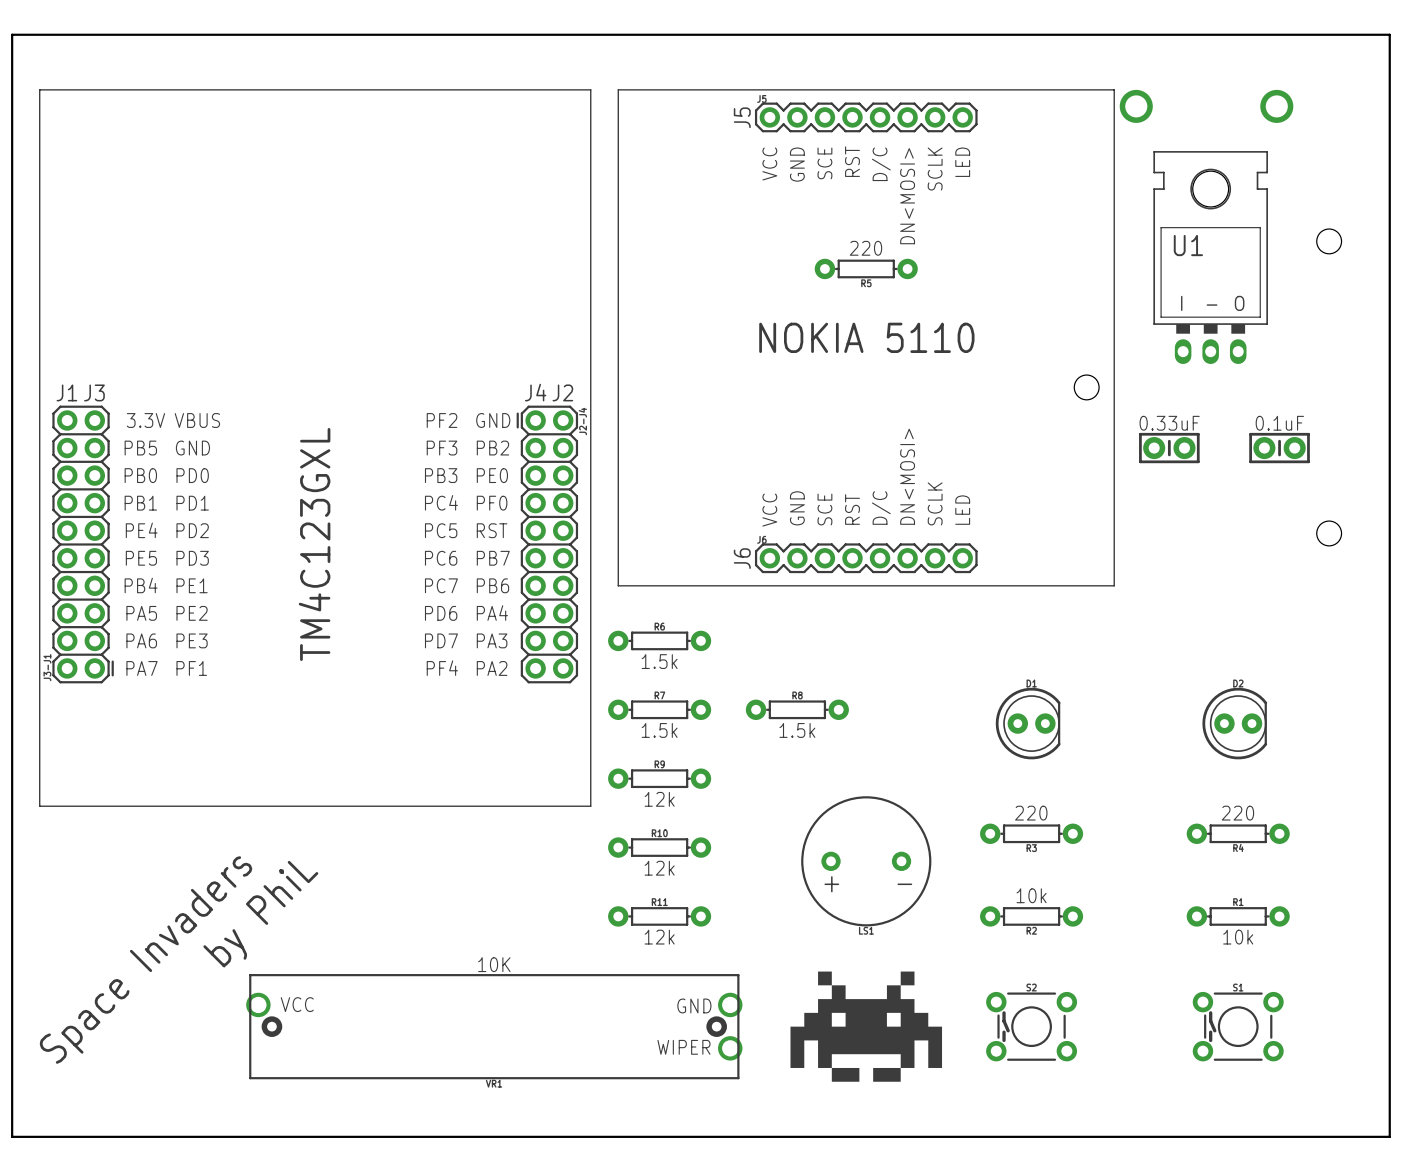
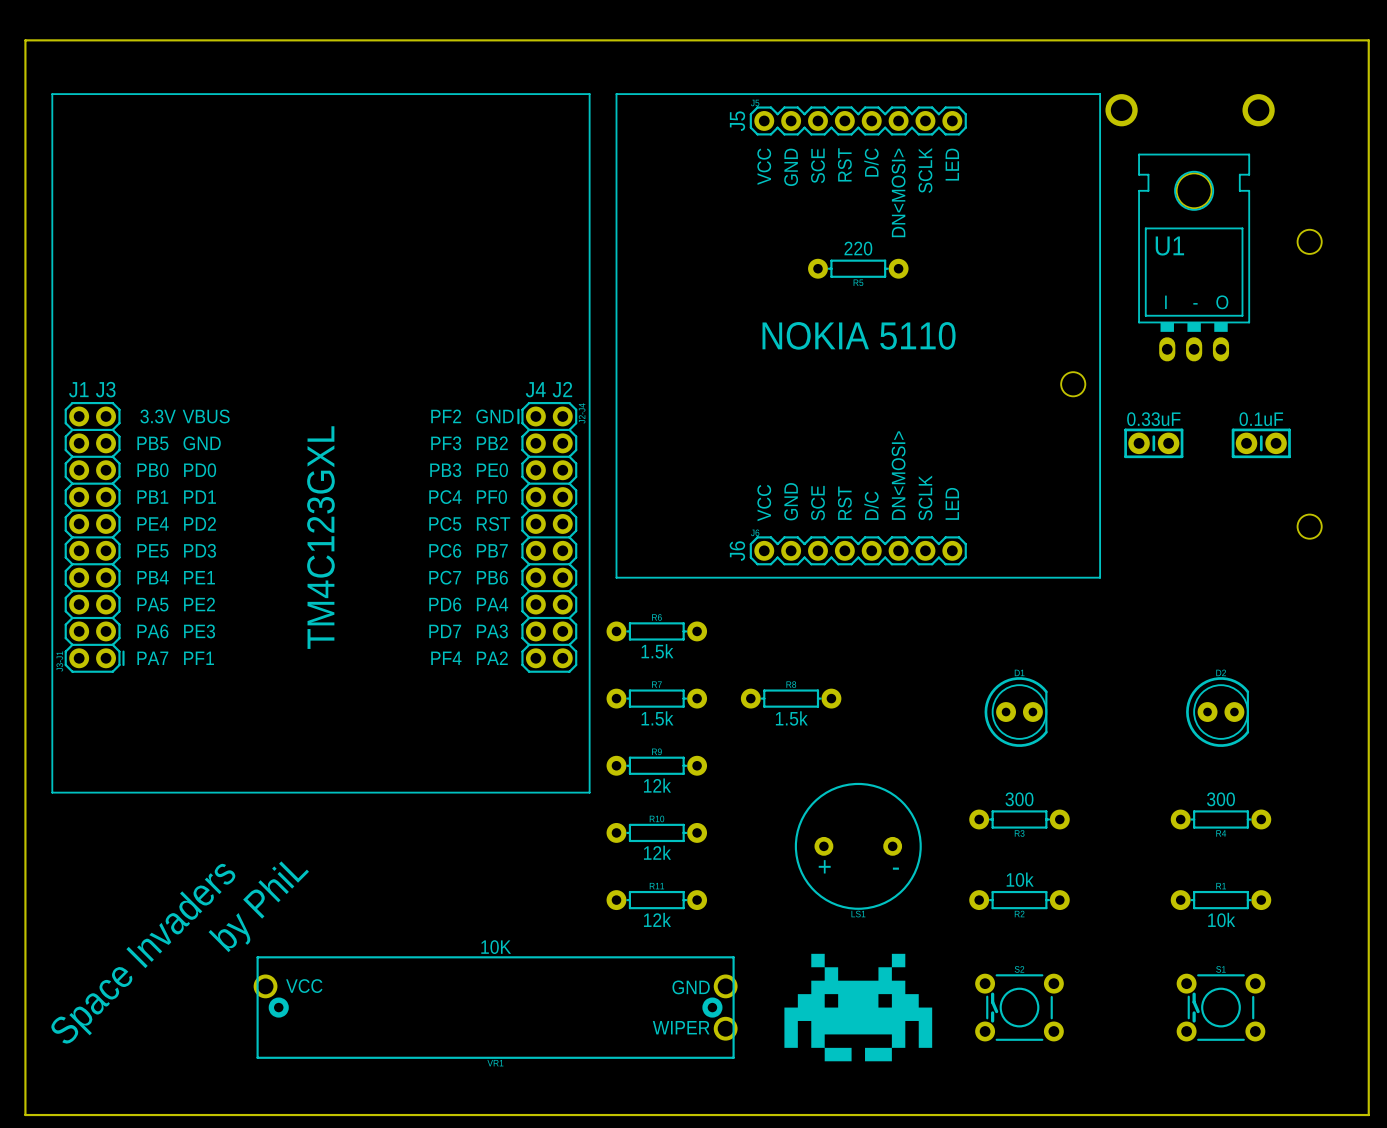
text: 220 (1031, 813) -> 300 (1019, 799)
text: 220 (1237, 813) -> 300 (1220, 799)

